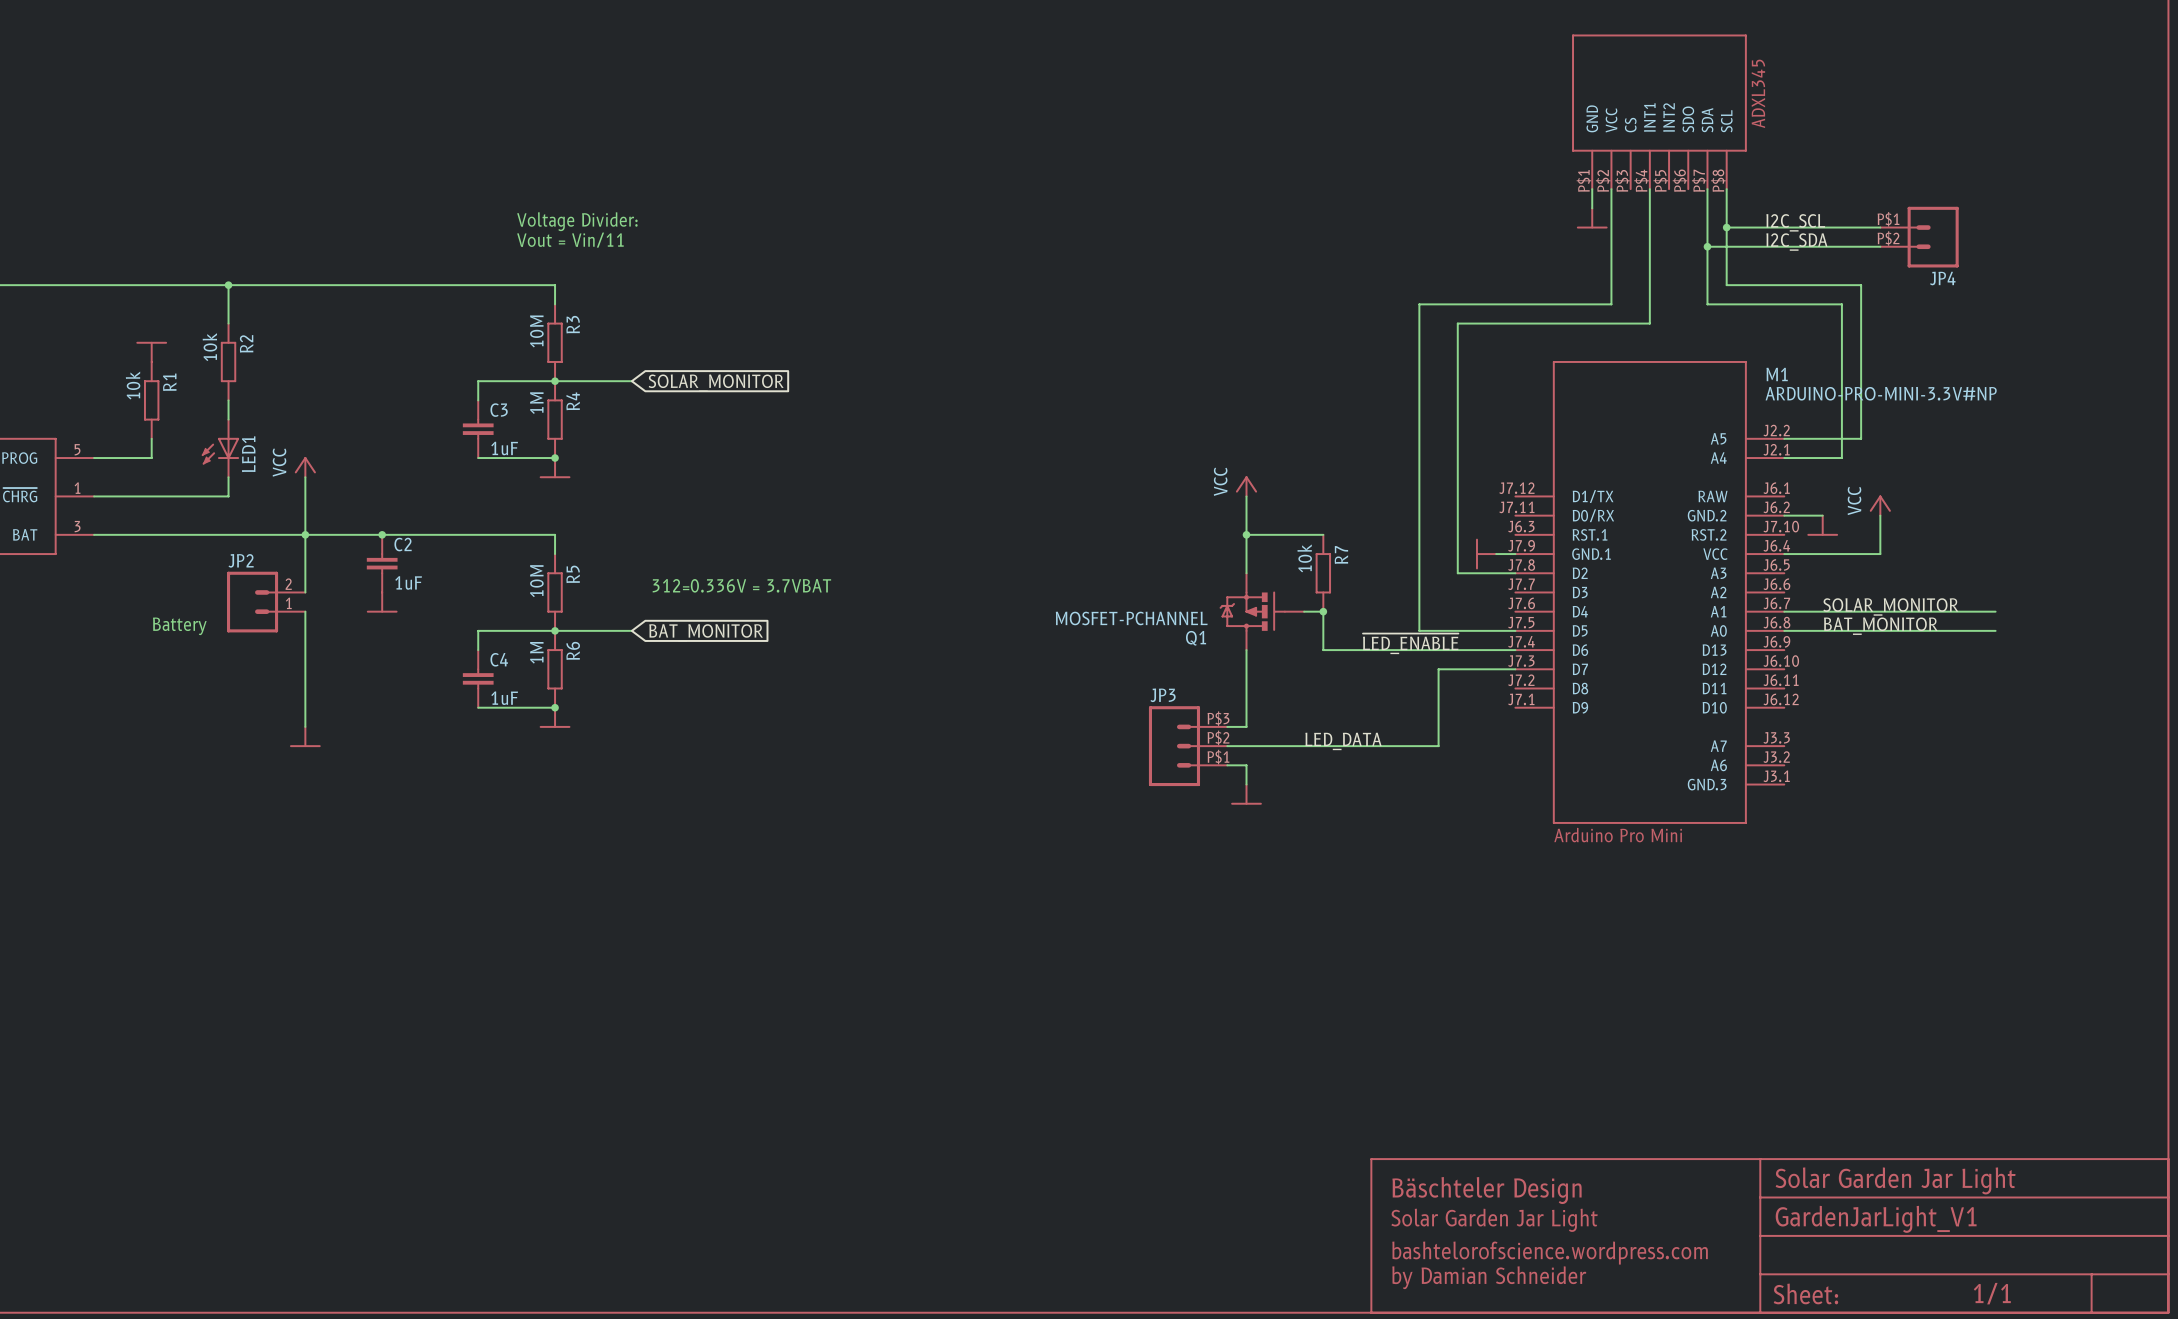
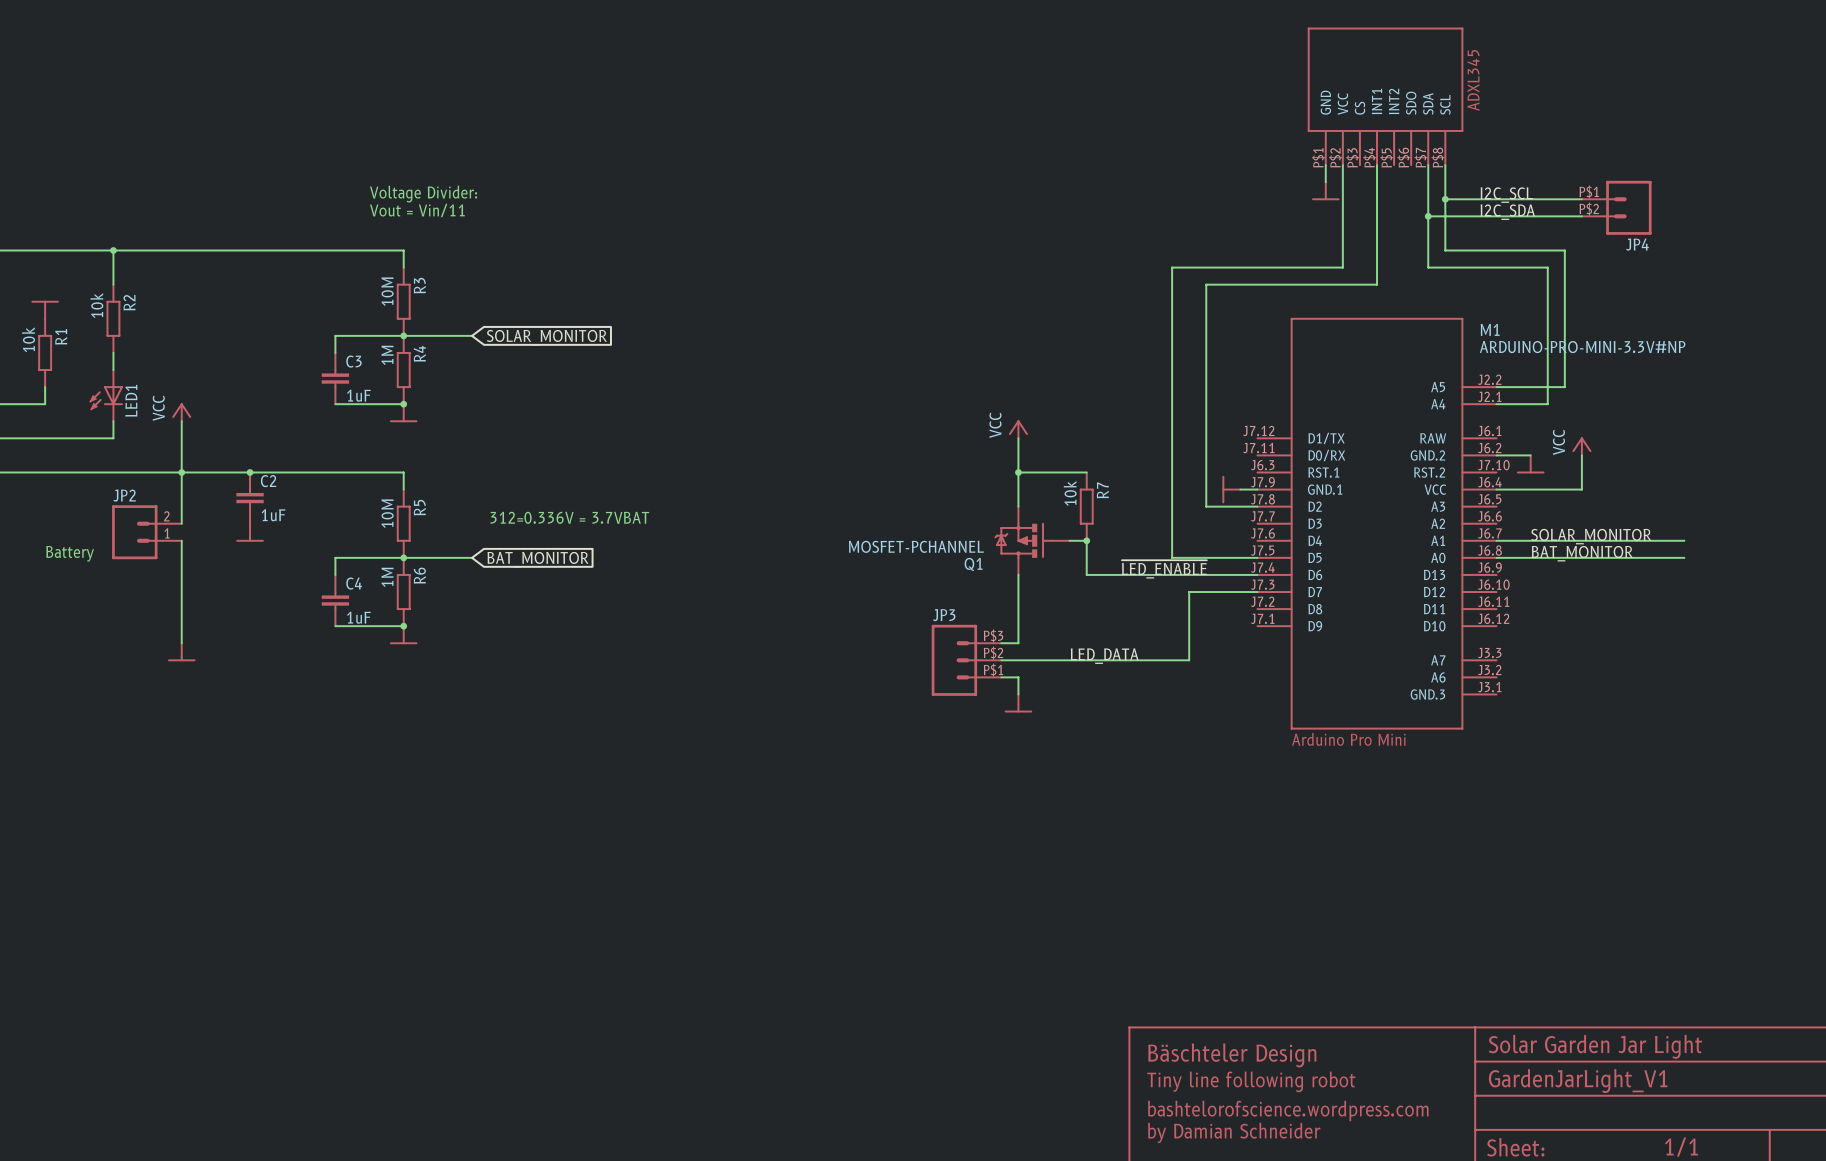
text: Solar Garden Jar Light (1494, 1220) -> Tiny line following robot (1251, 1081)

